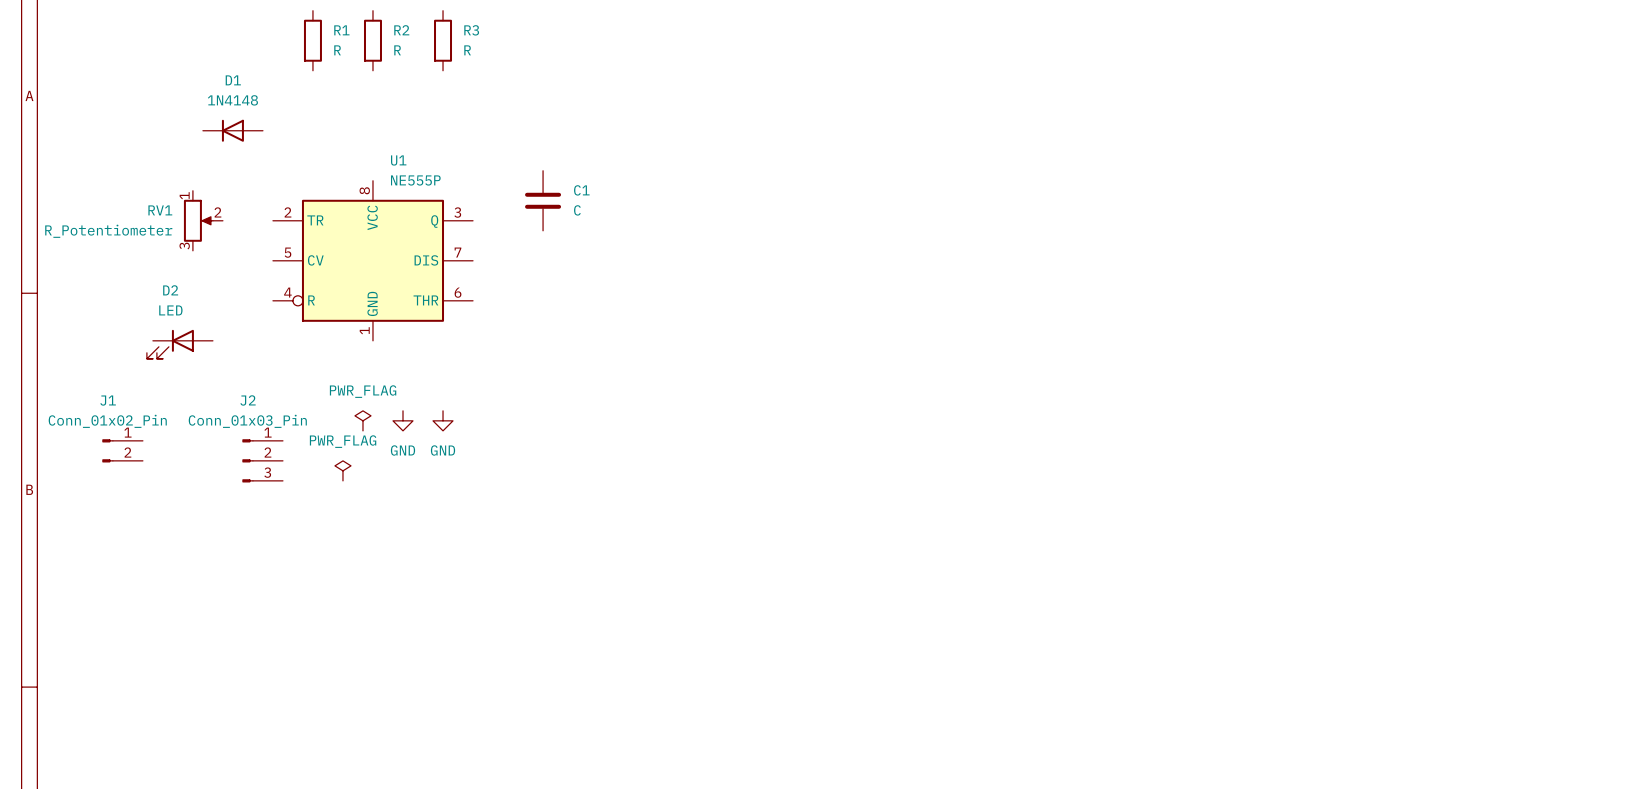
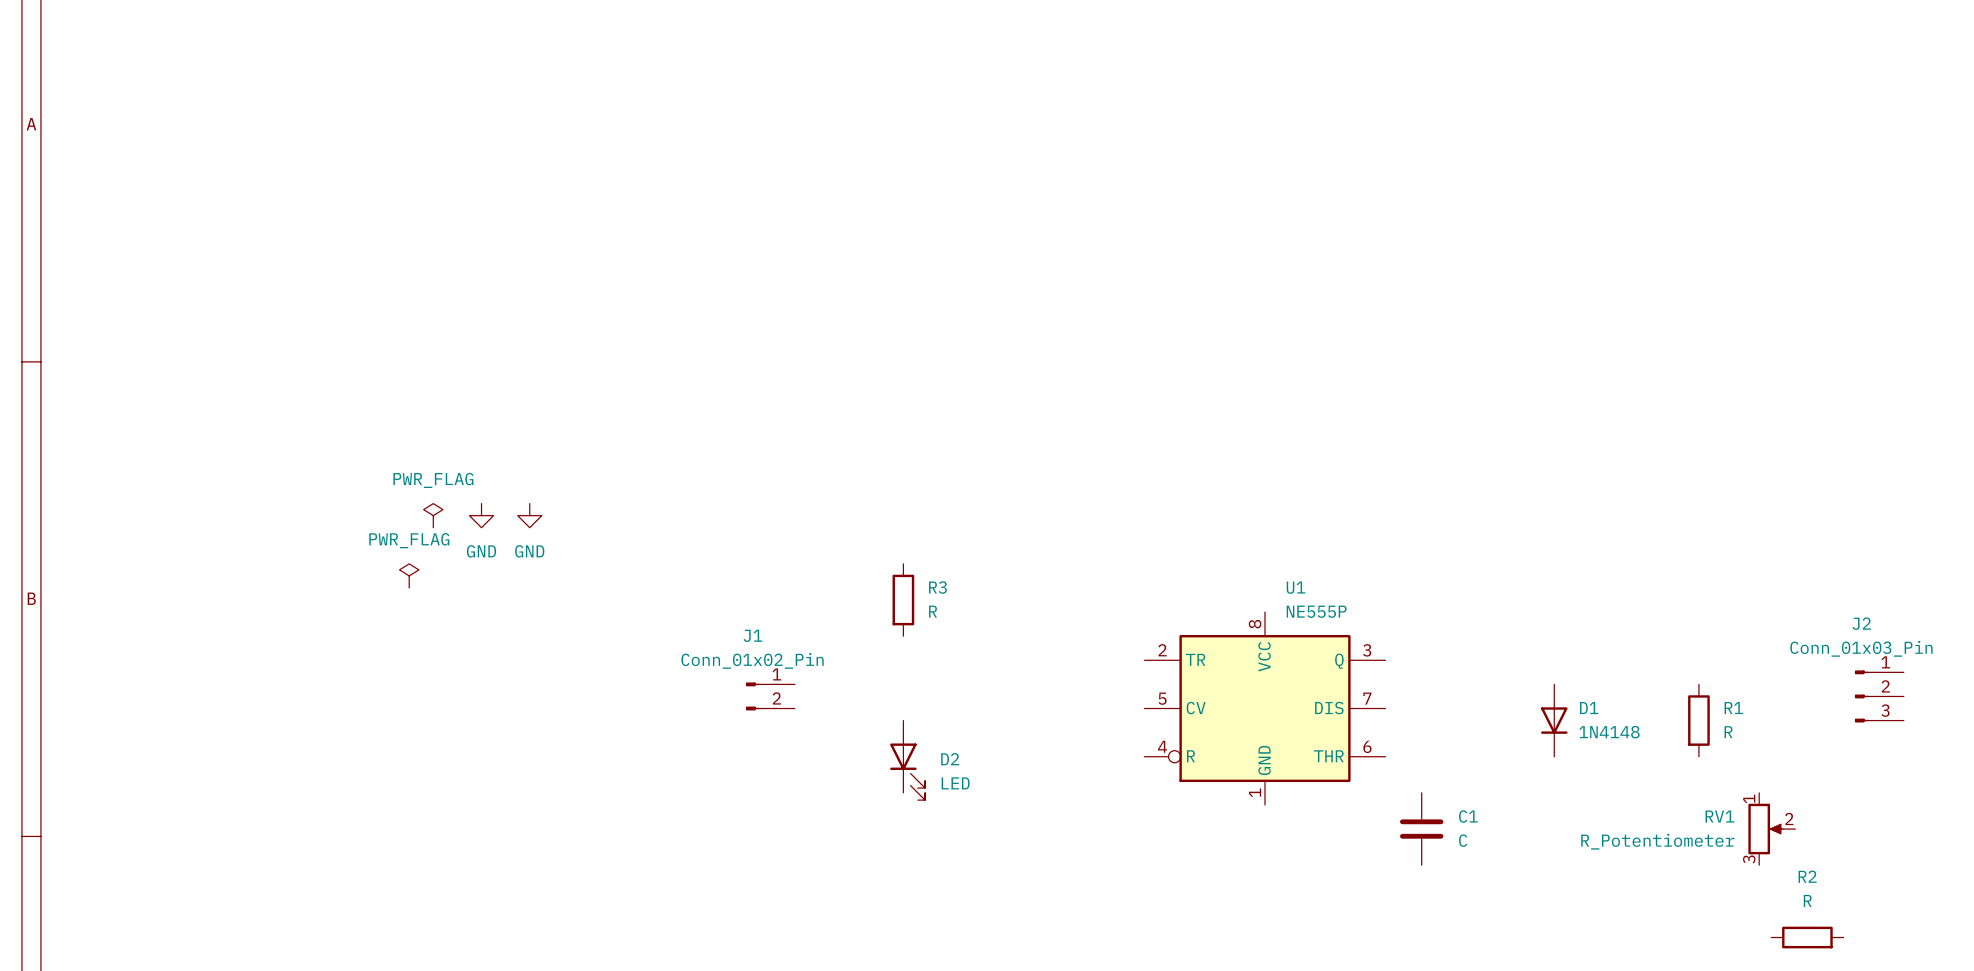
R2 name position: R2 (401, 30) -> R2 (1807, 876)
R1 position: (312, 40) -> (1698, 720)
R2 rotation: 0° (372, 40) -> 90° clockwise (1807, 937)
R2 position: (372, 40) -> (1807, 937)
R3 position: (443, 40) -> (903, 600)
R2 value position: R (397, 50) -> R (1807, 900)
D1 name position: D1 (233, 80) -> D1 (1589, 708)
D1 value position: 1N4148 (232, 100) -> 1N4148 (1609, 732)
D1 rotation: 0° (232, 130) -> 90° counterclockwise (1554, 720)
D1 position: (232, 130) -> (1554, 720)
C1 position: (543, 200) -> (1421, 829)
RV1 position: (203, 220) -> (1771, 829)
U1 position: (372, 260) -> (1265, 708)
D2 name position: D2 (170, 290) -> D2 (950, 759)
D2 value position: LED (170, 310) -> LED (955, 783)
D2 rotation: 0° (170, 344) -> 90° counterclockwise (907, 771)
D2 position: (179, 344) -> (907, 760)
J1 position: (122, 450) -> (770, 696)
J2 position: (262, 460) -> (1879, 696)

